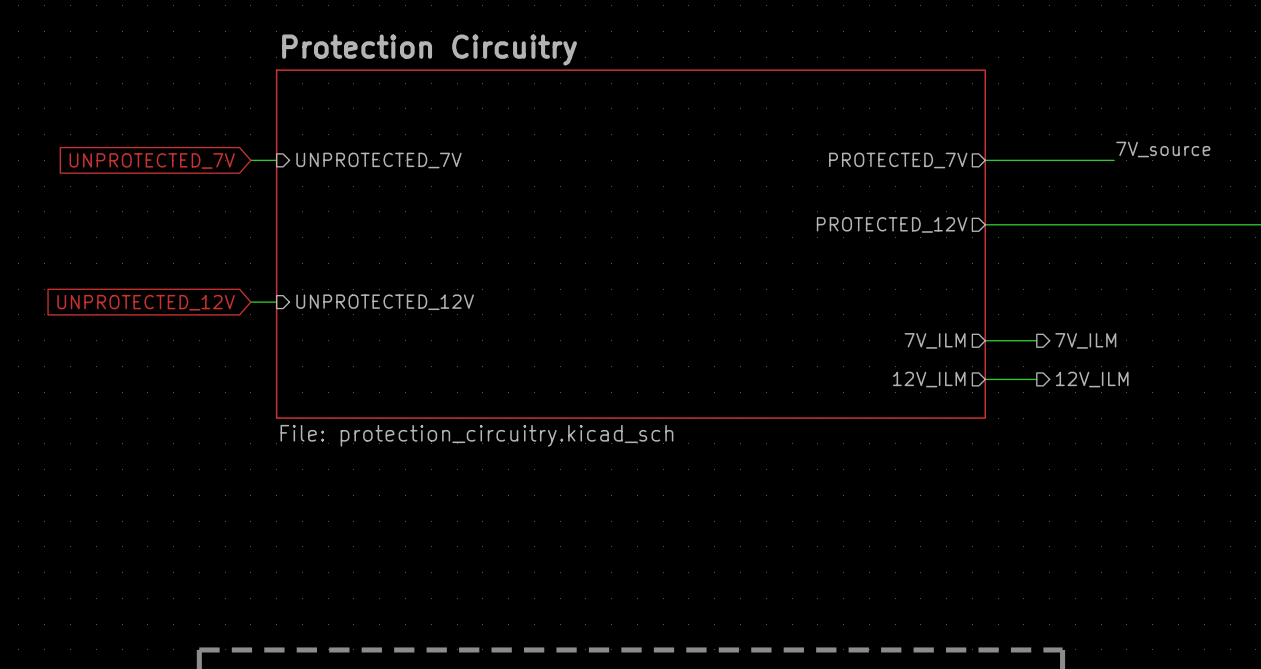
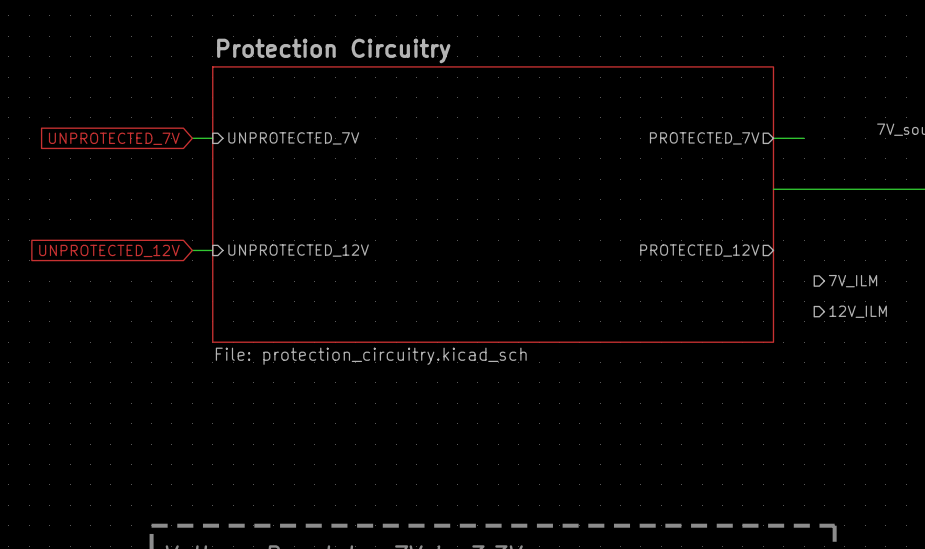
wire: (1023, 160) (1114, 160) -> none
sheet pin position: PROTECTED_12V (892, 224) -> PROTECTED_12V (699, 250)
sheet pin: 7V_ILM (935, 340) -> none
wire: (985, 340) (1036, 340) -> none
sheet pin: 12V_ILM (929, 379) -> none
wire: (985, 379) (1036, 379) -> none

